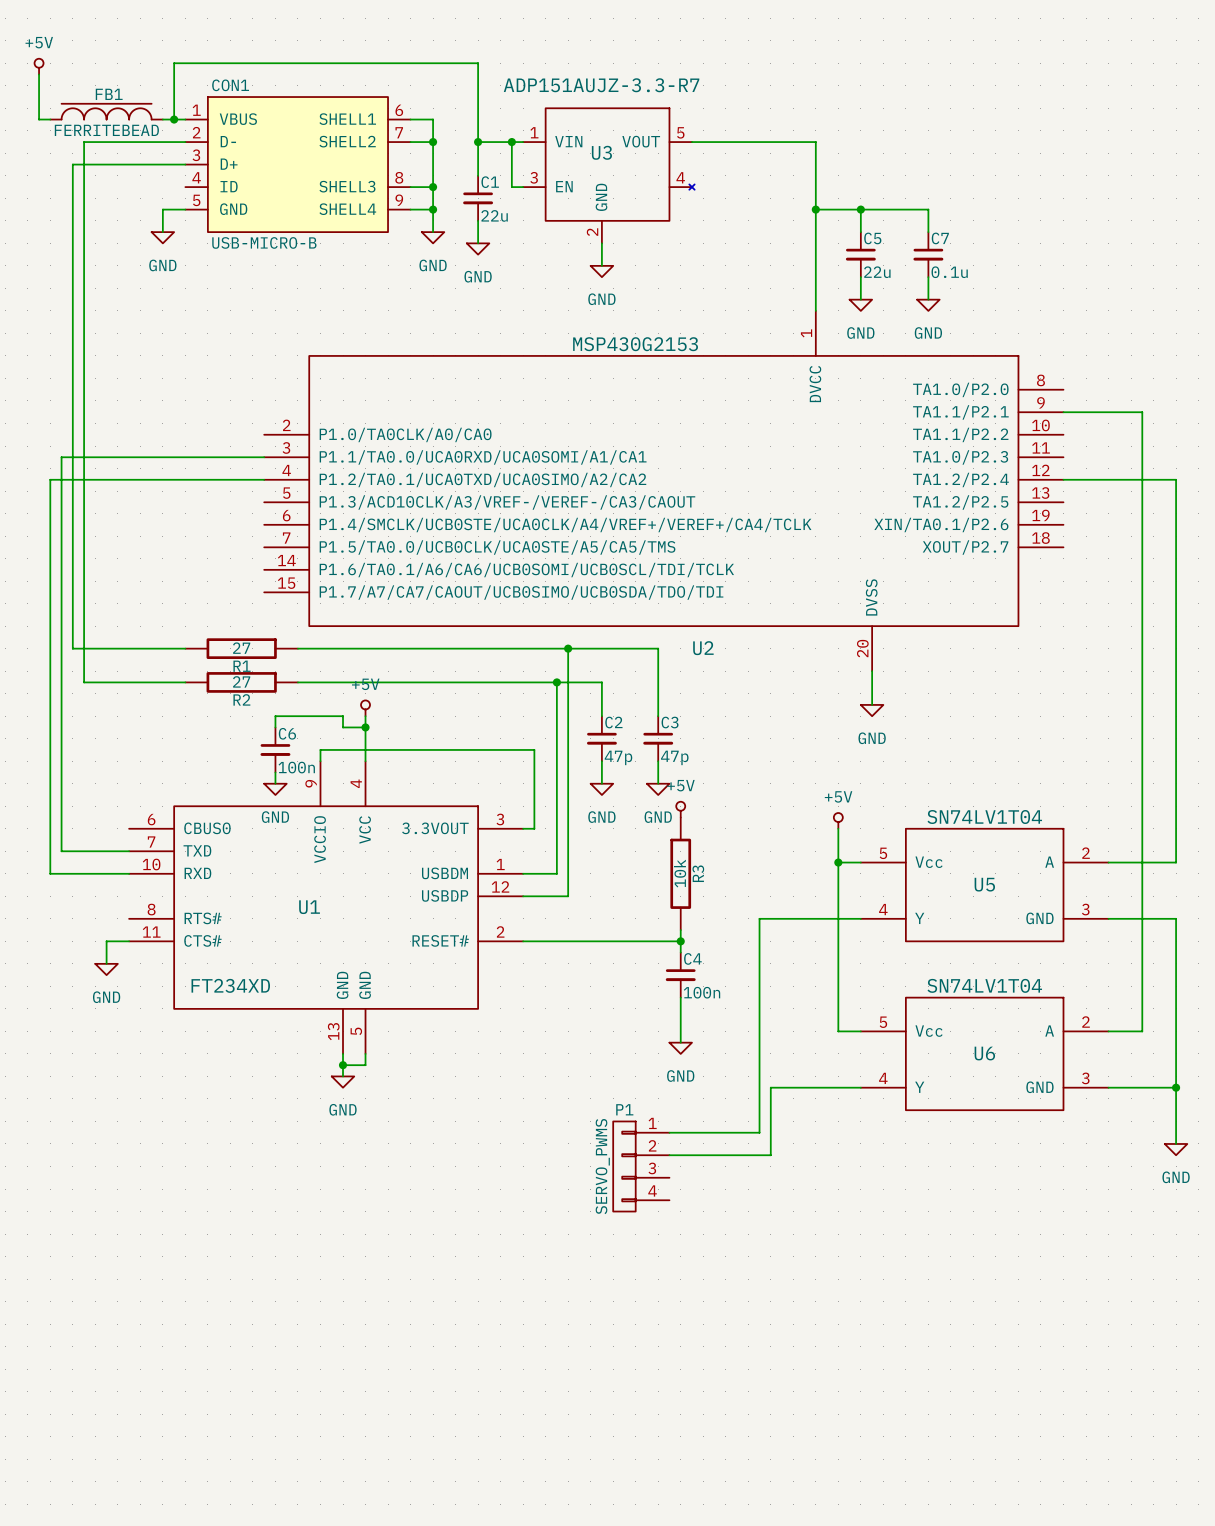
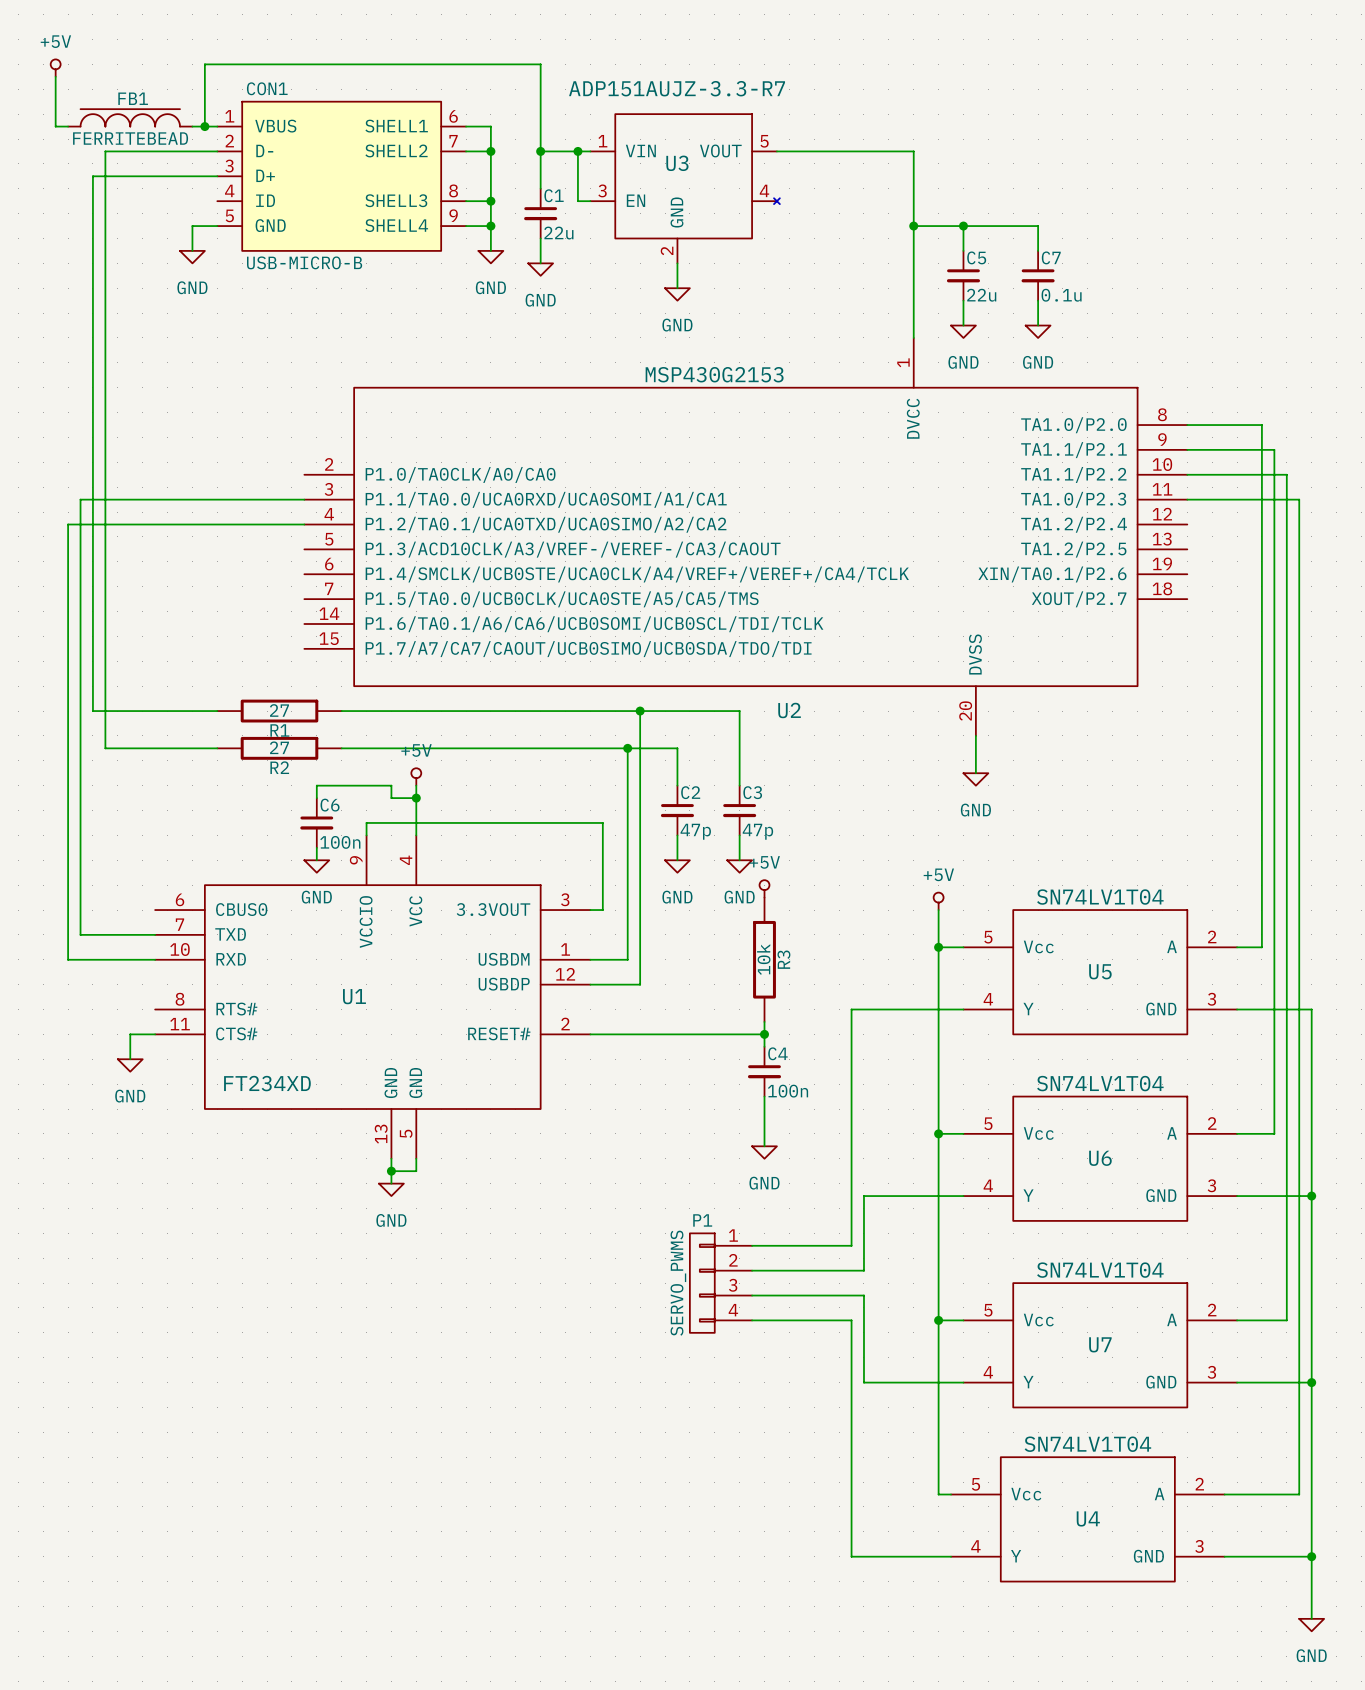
wire: none -> (1187, 474) (1286, 474) (1286, 1320) (1237, 1320)
wire: none -> (1187, 499) (1299, 499) (1299, 1494) (1224, 1494)
wire: (1063, 479) (1176, 479) (1176, 862) (1131, 862) -> (1187, 425) (1261, 425) (1261, 947)
wire: none -> (938, 1133) (938, 1494) (951, 1494)
junction: none -> (938, 1133)
wire: none -> (1311, 1258) (1311, 1618)
power symbol: GND (1176, 1149) -> none
wire: none -> (752, 1295) (863, 1295) (863, 1382) (963, 1382)
wire: none -> (752, 1320) (851, 1320) (851, 1556) (951, 1556)
wire: none -> (938, 1320) (963, 1320)
junction: none -> (938, 1320)
U7: none -> SN74LV1T04 (1100, 1345)
wire: none -> (1237, 1382) (1311, 1382)
junction: none -> (1311, 1382)
U4: none -> SN74LV1T04 (1087, 1519)
wire: none -> (1224, 1556) (1311, 1556)
junction: none -> (1311, 1556)
power symbol: none -> GND (1311, 1625)

